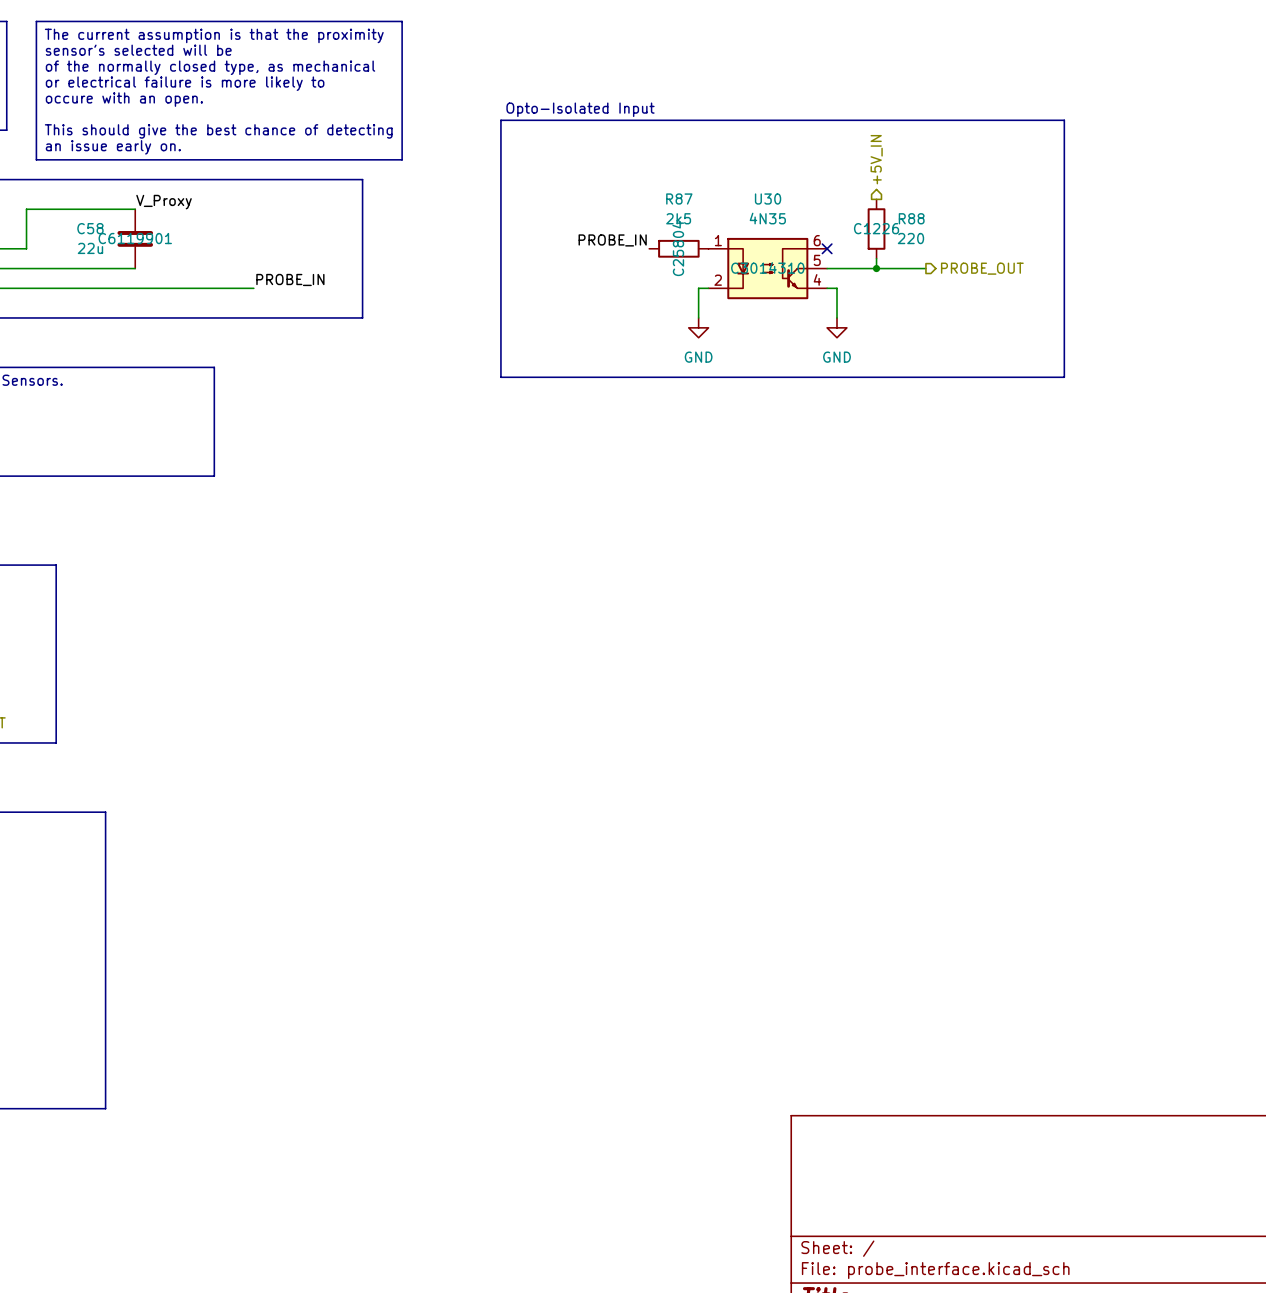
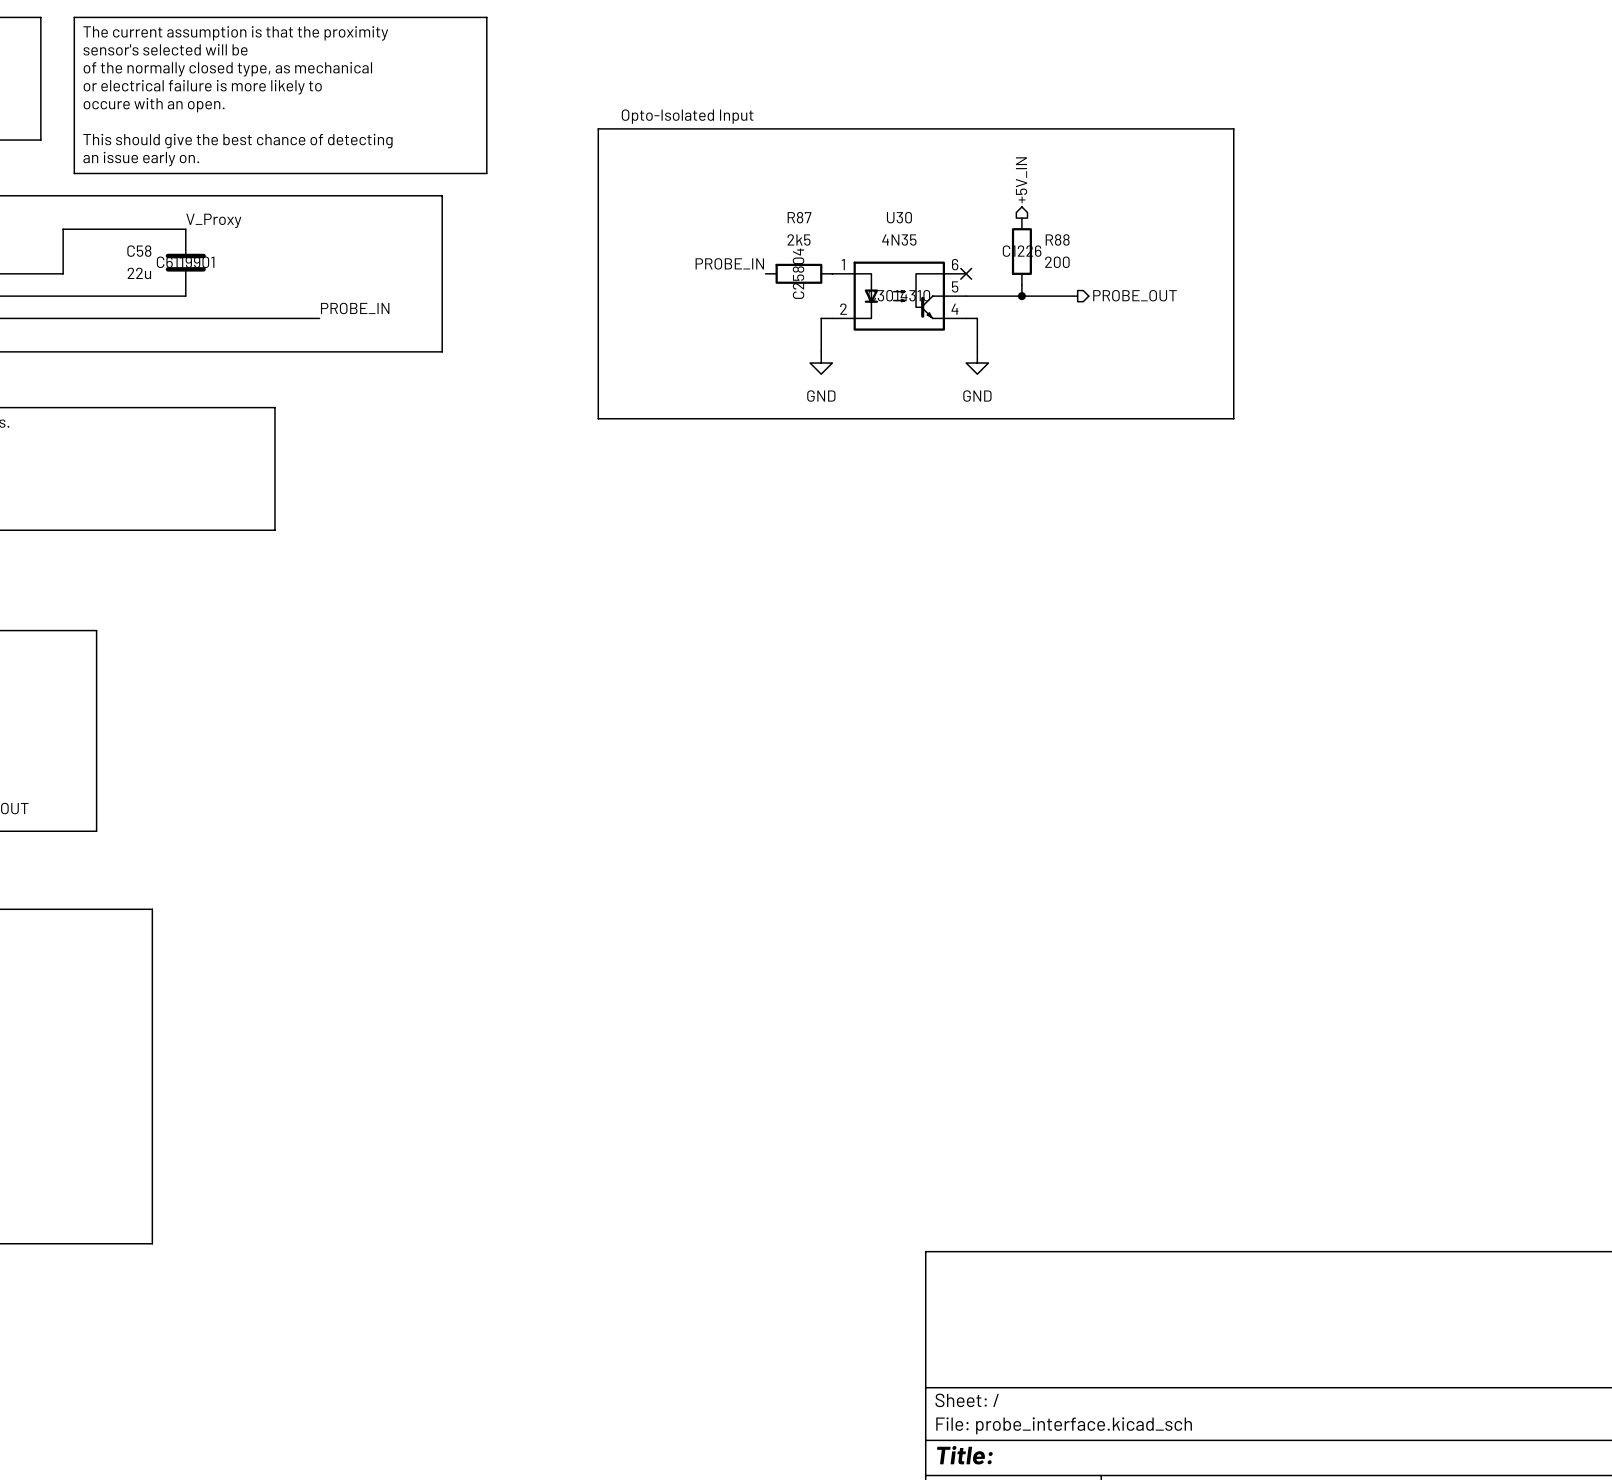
R88 value: 220 (910, 238) -> 200 (1057, 262)

